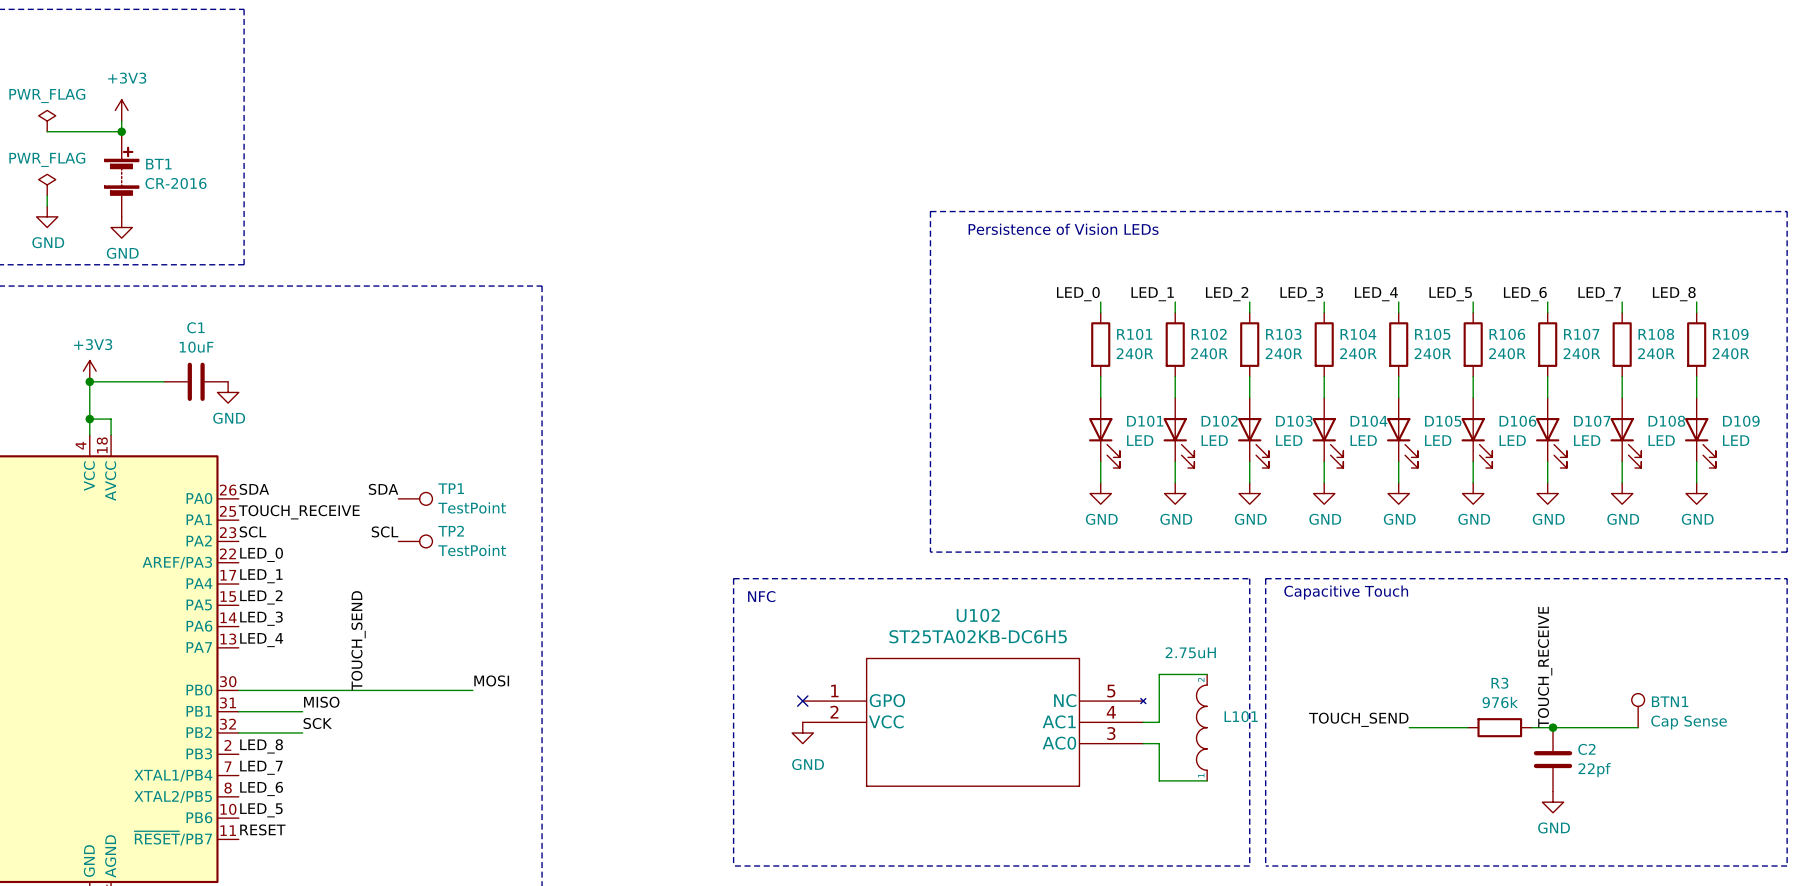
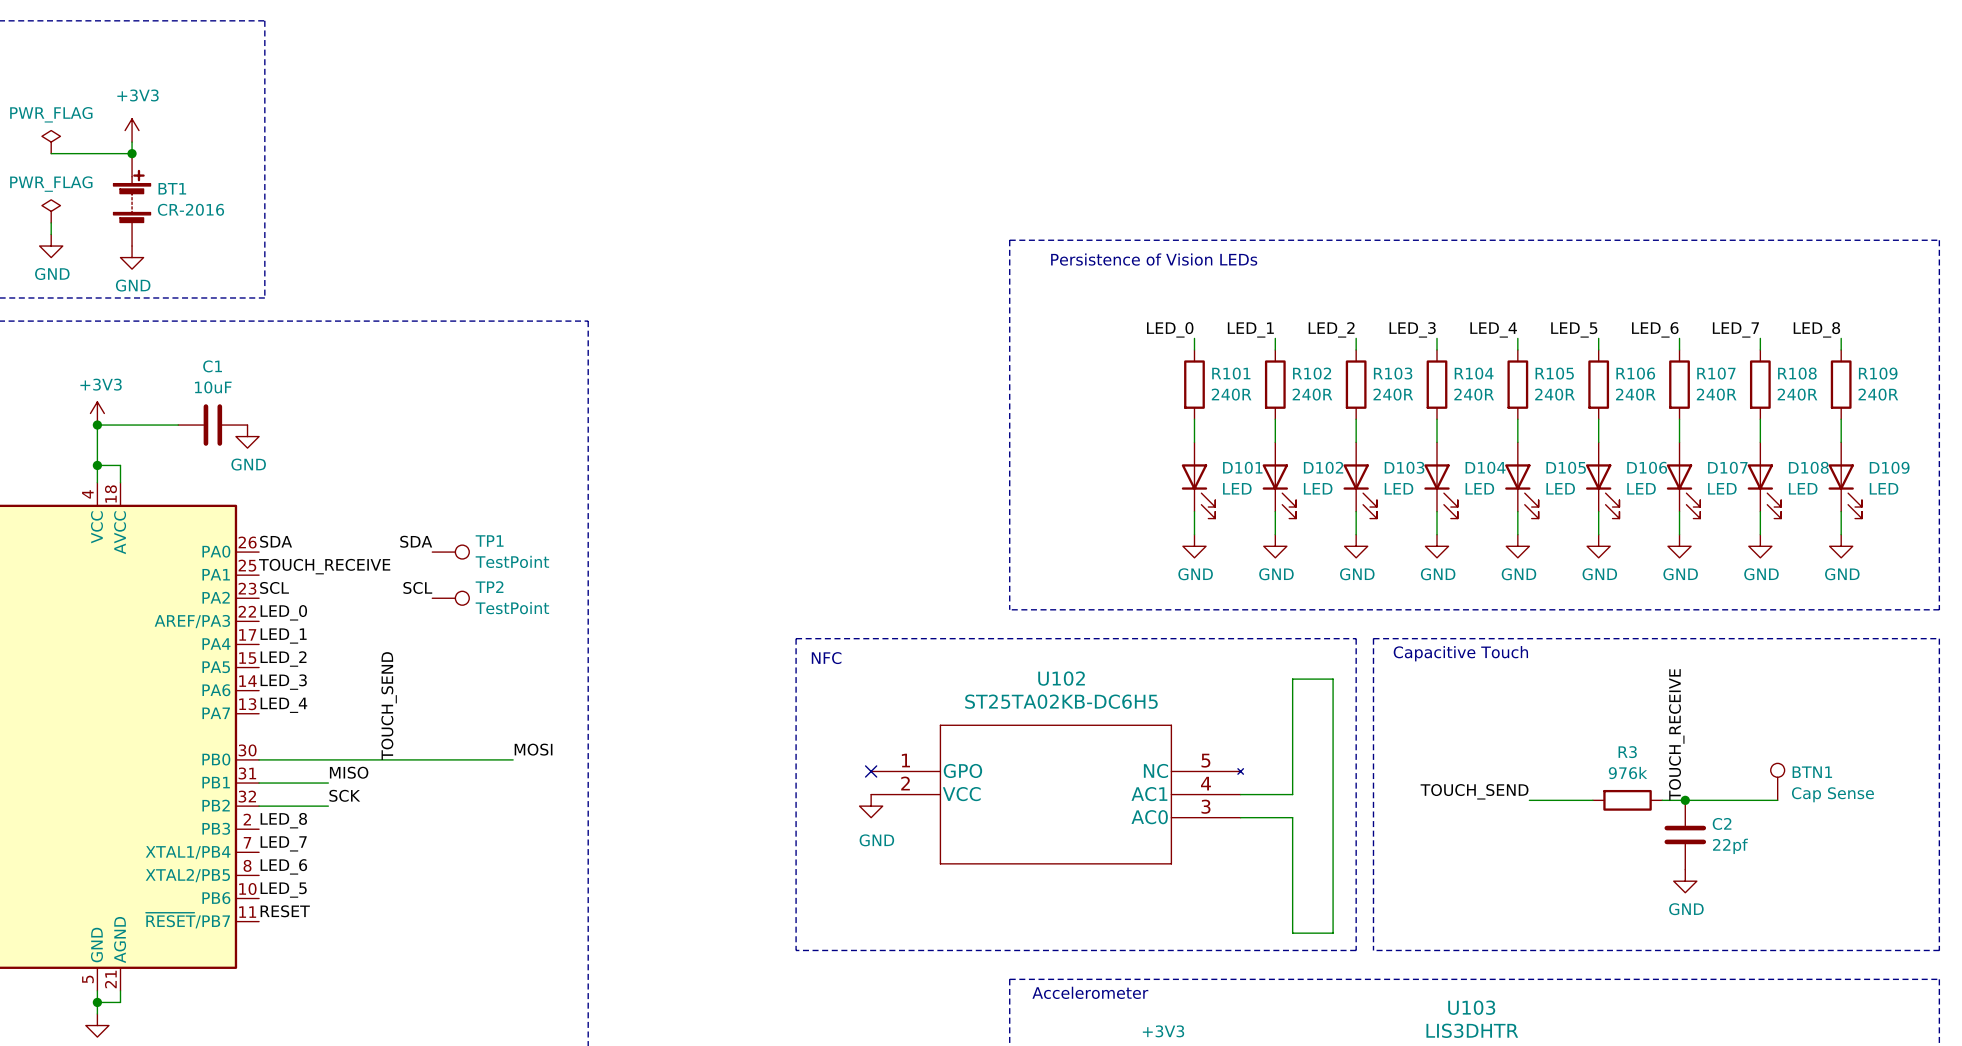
wire: (1207, 674) (1159, 674) (1159, 722) -> none
L101: 2.75uH (1201, 727) -> none
wire: (1159, 743) (1159, 780) (1207, 780) -> (1258, 817) (1292, 817) (1292, 933) (1333, 933) (1333, 679) (1292, 679) (1292, 794) (1258, 794)

